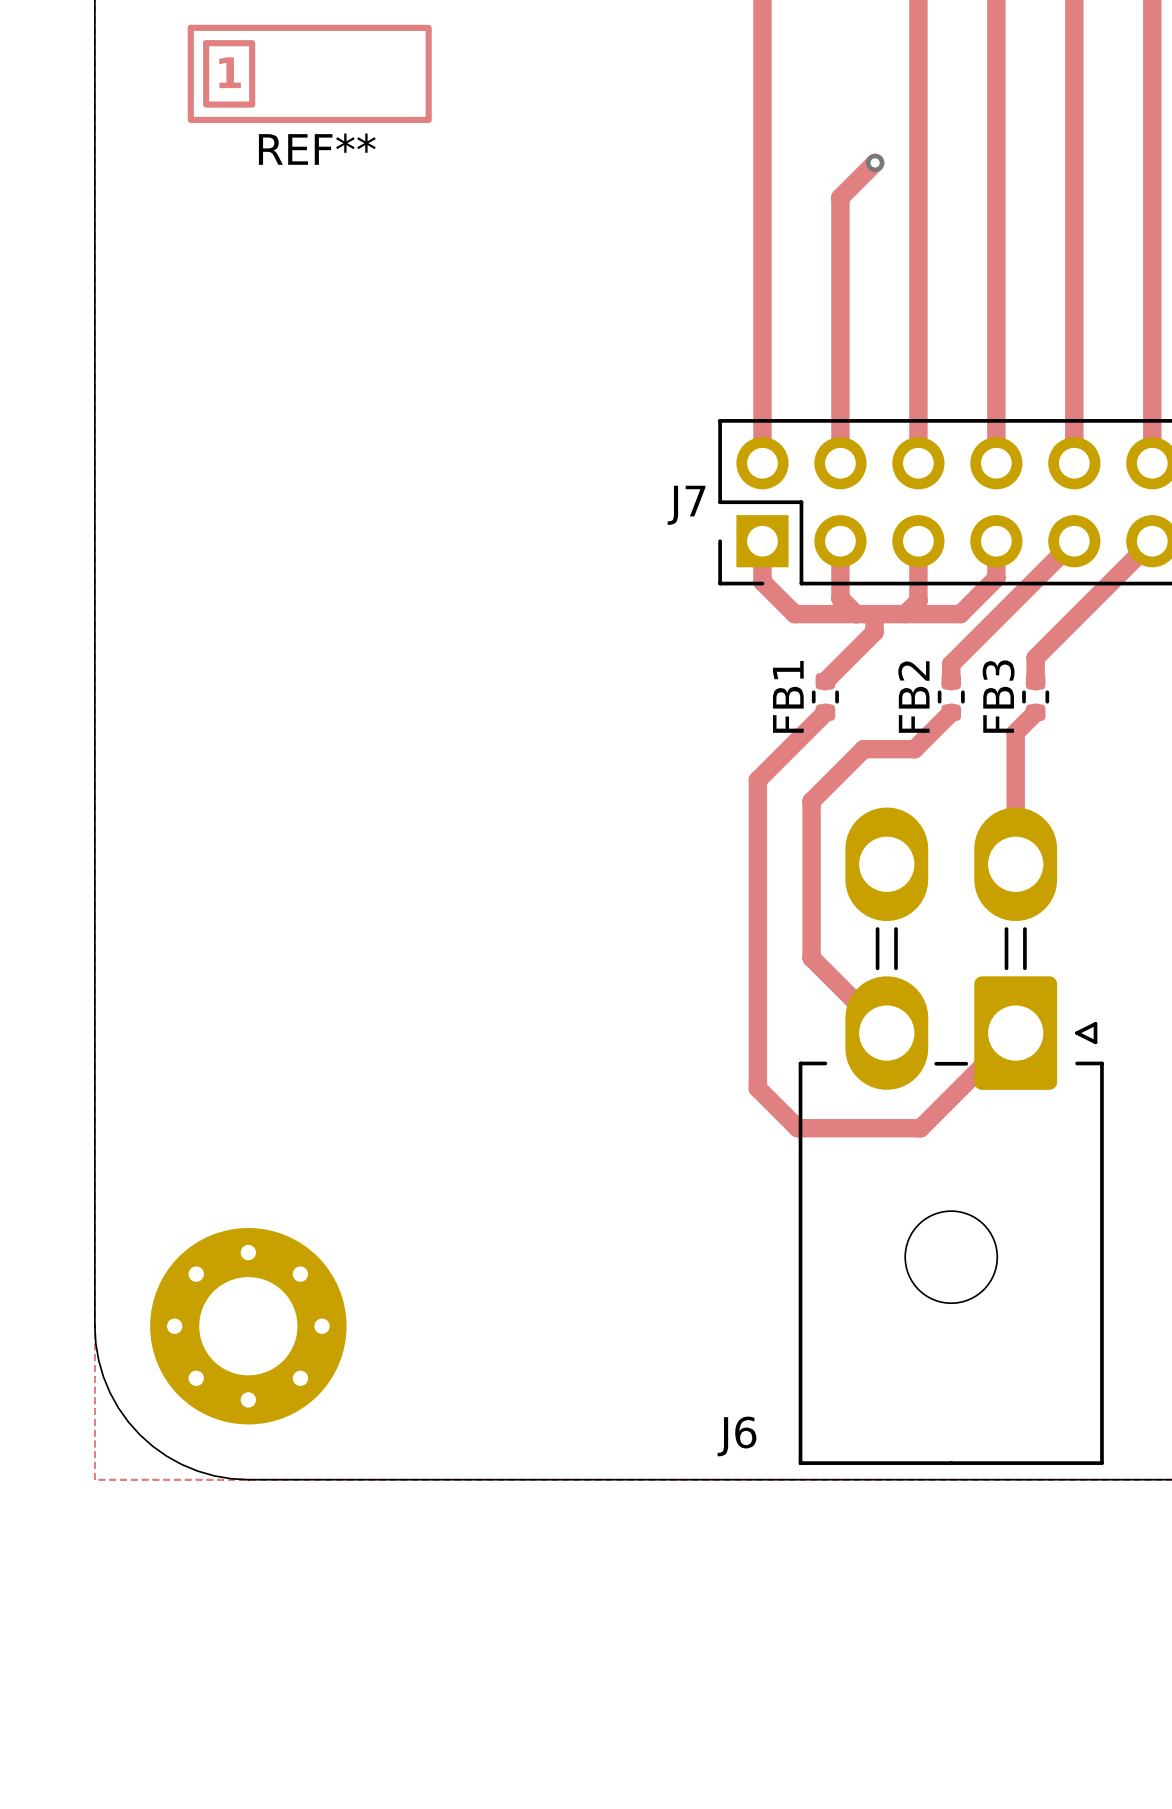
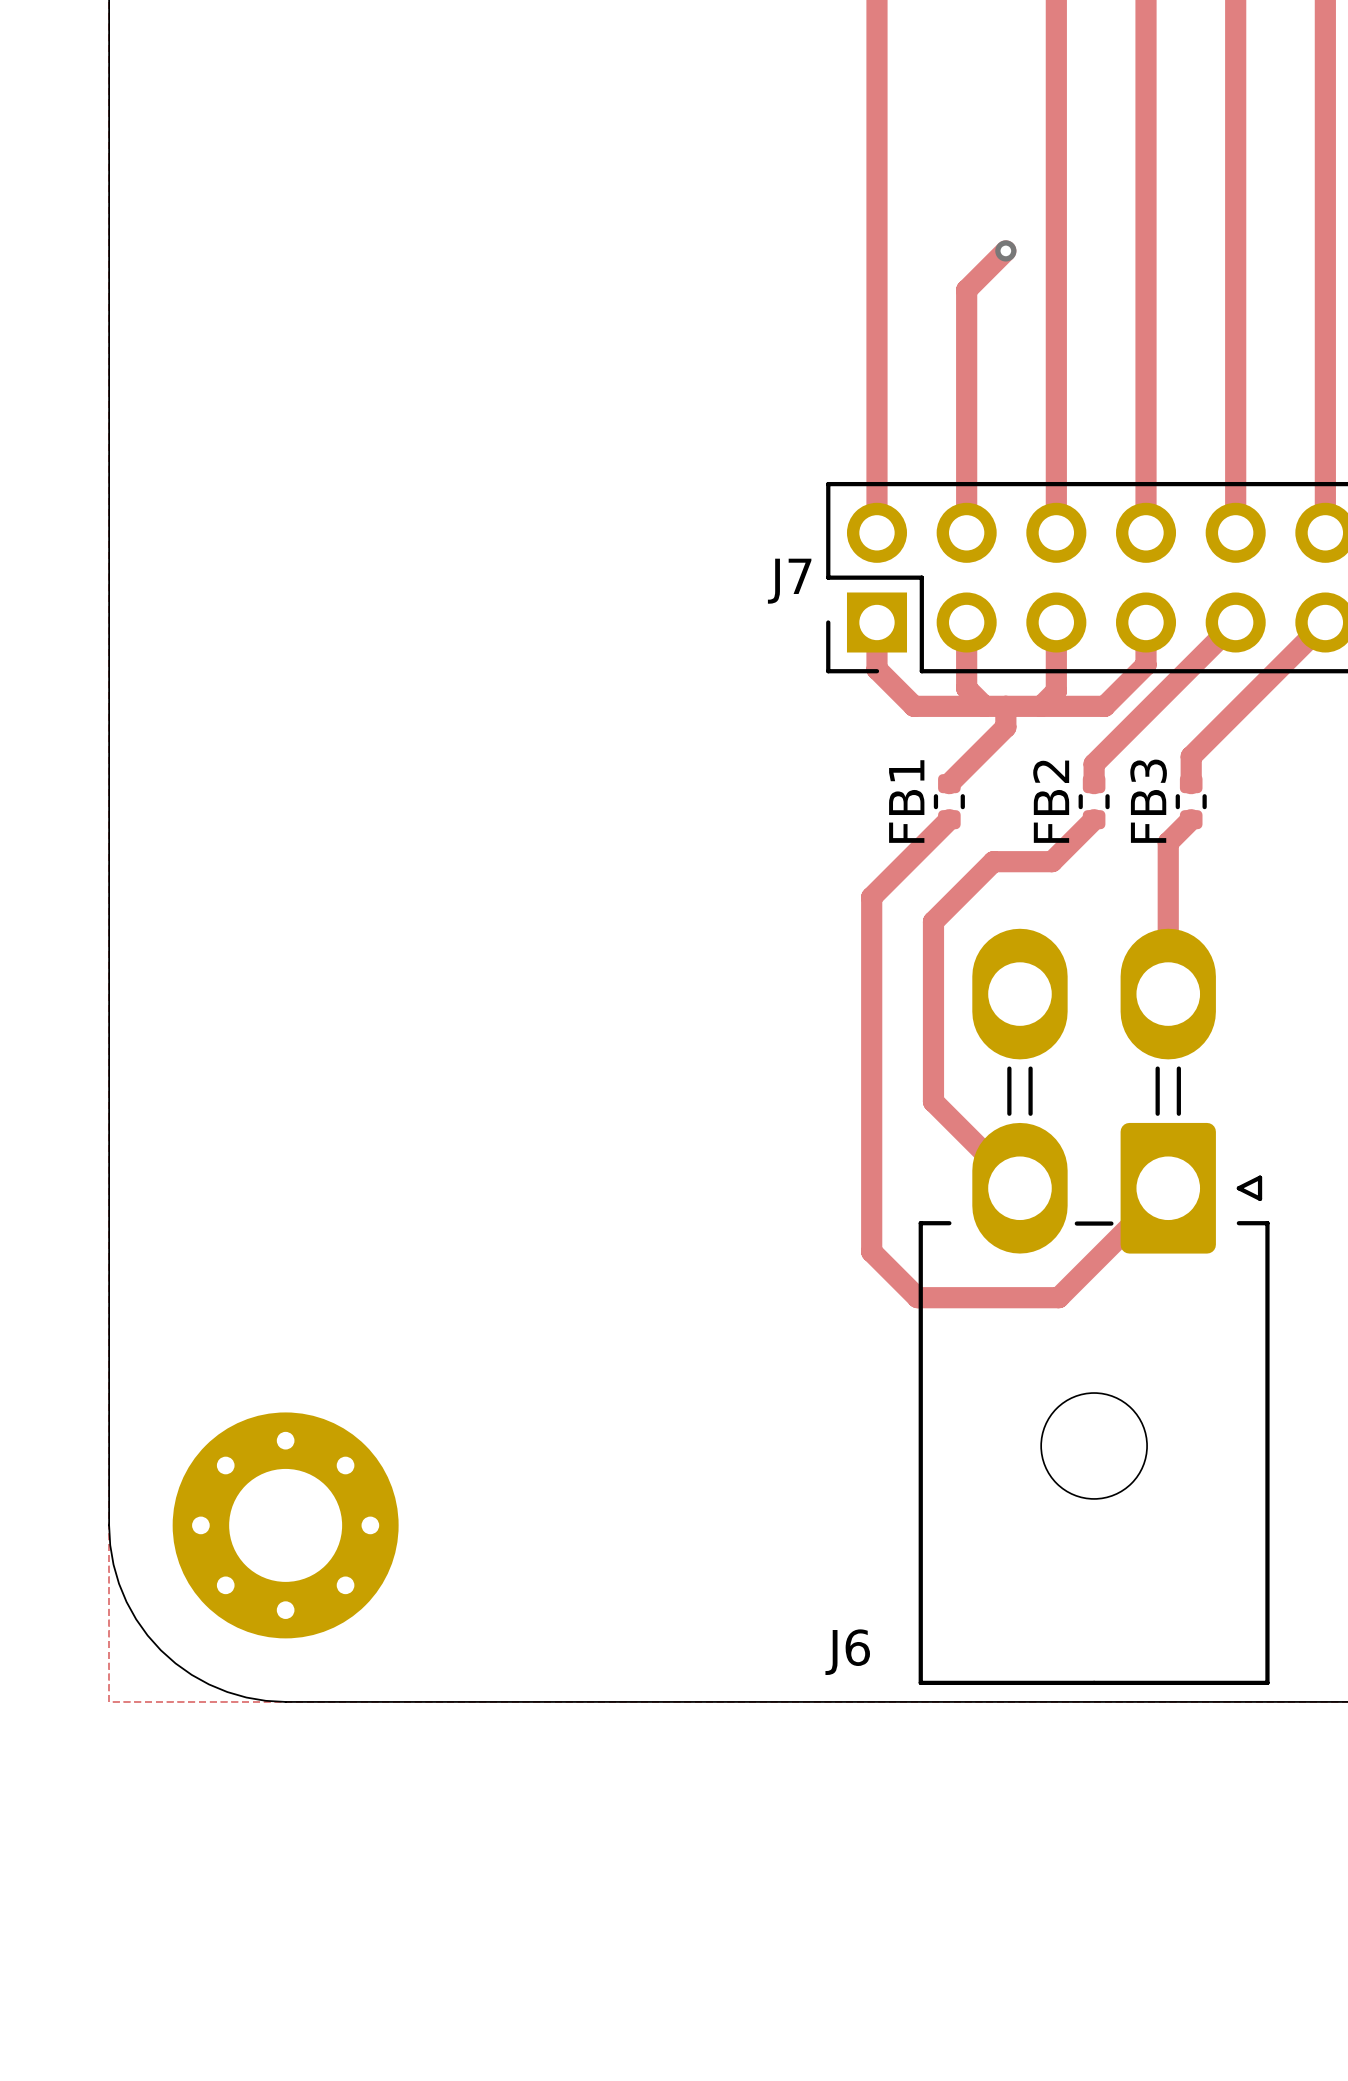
REF**: (309, 73) -> none
track: (875, 162) (840, 197) (840, 252) -> (1005, 250) (966, 290)
via position: (875, 162) -> (1005, 250)

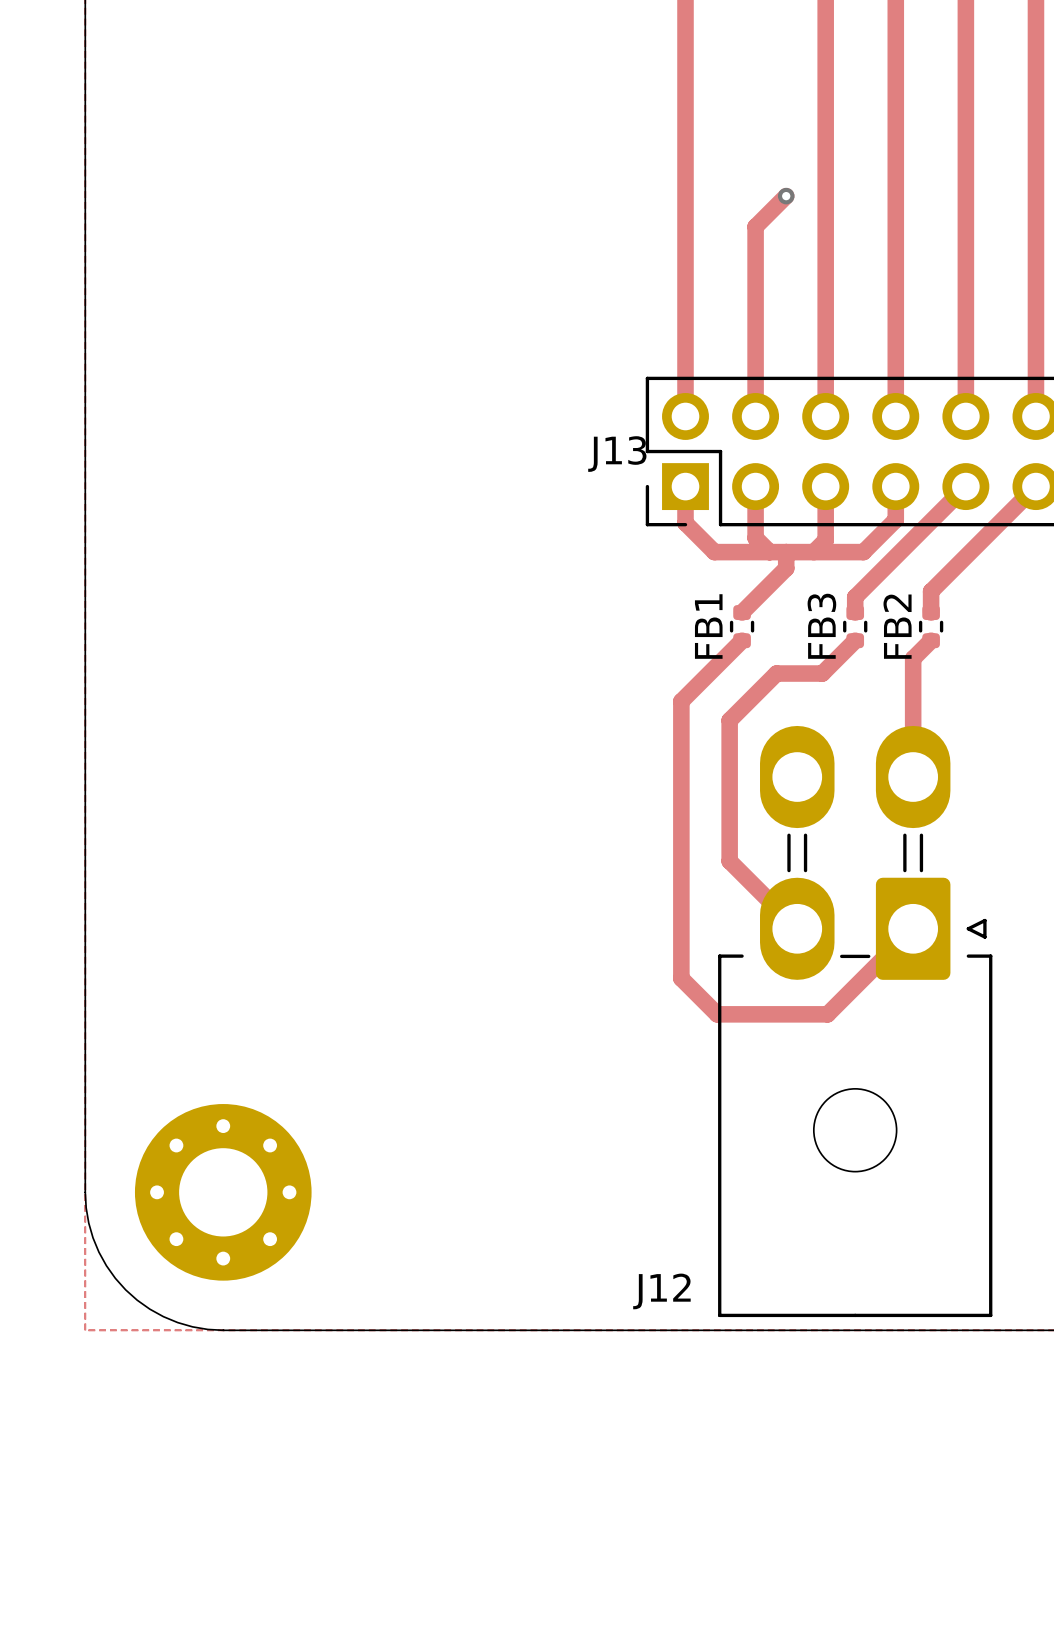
J7 name: J7 (789, 581) -> J13 (617, 454)
FB2 name: FB2 (1051, 801) -> FB3 (821, 626)
FB3 name: FB3 (1148, 801) -> FB2 (897, 626)
J6 name: J6 (847, 1652) -> J12 (661, 1291)

